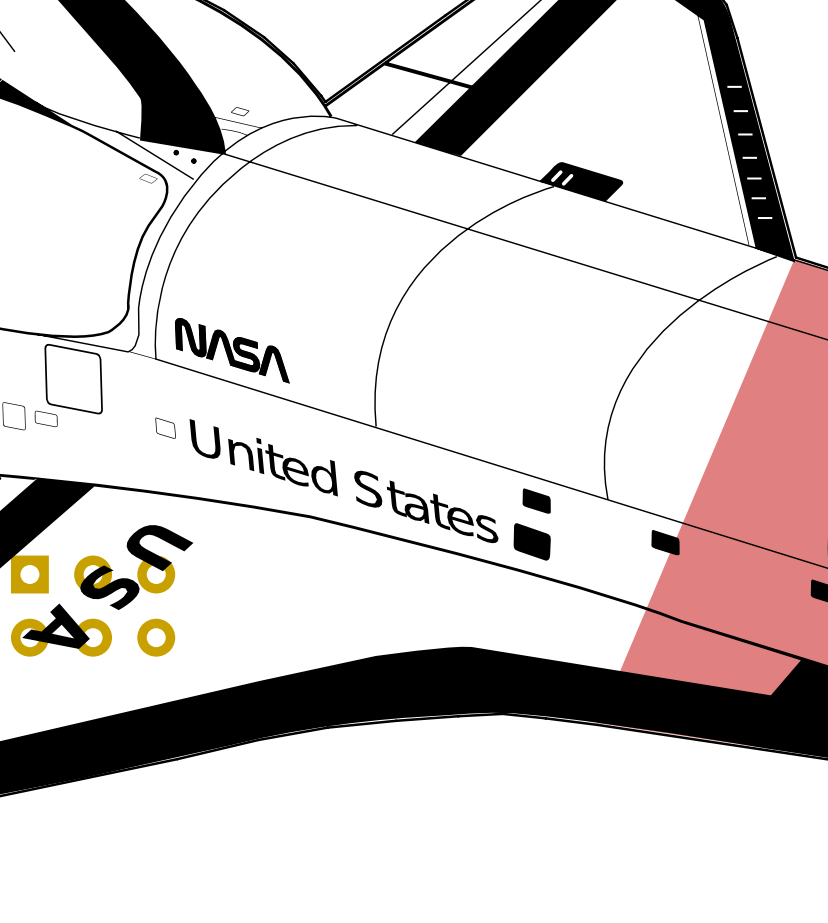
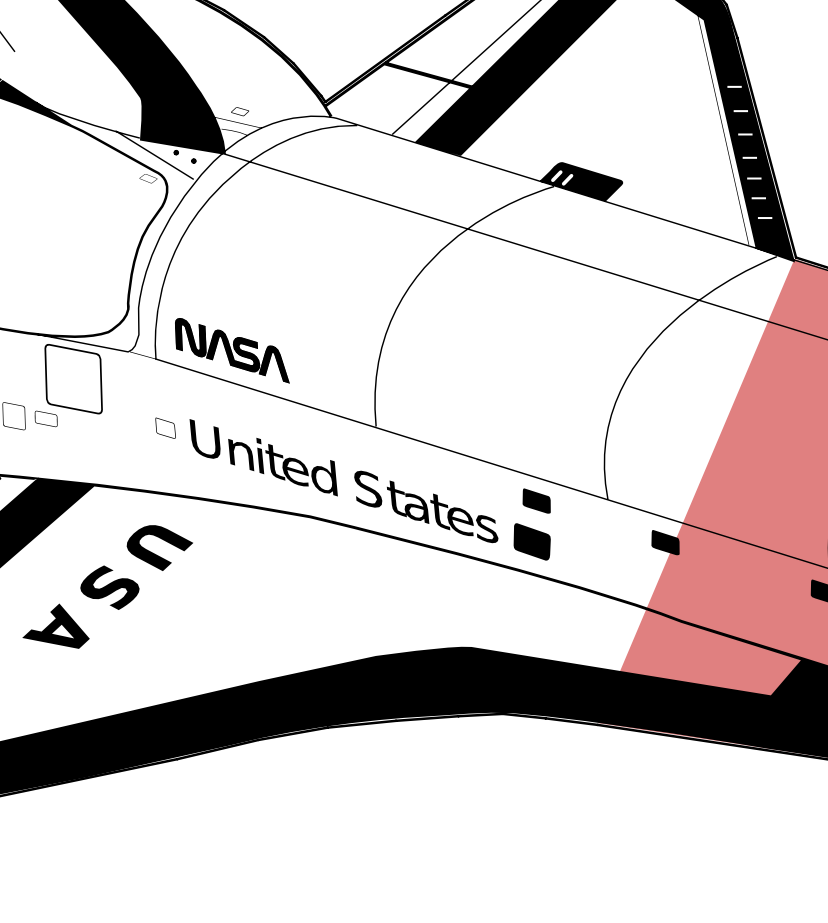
part: (93, 606) -> none

